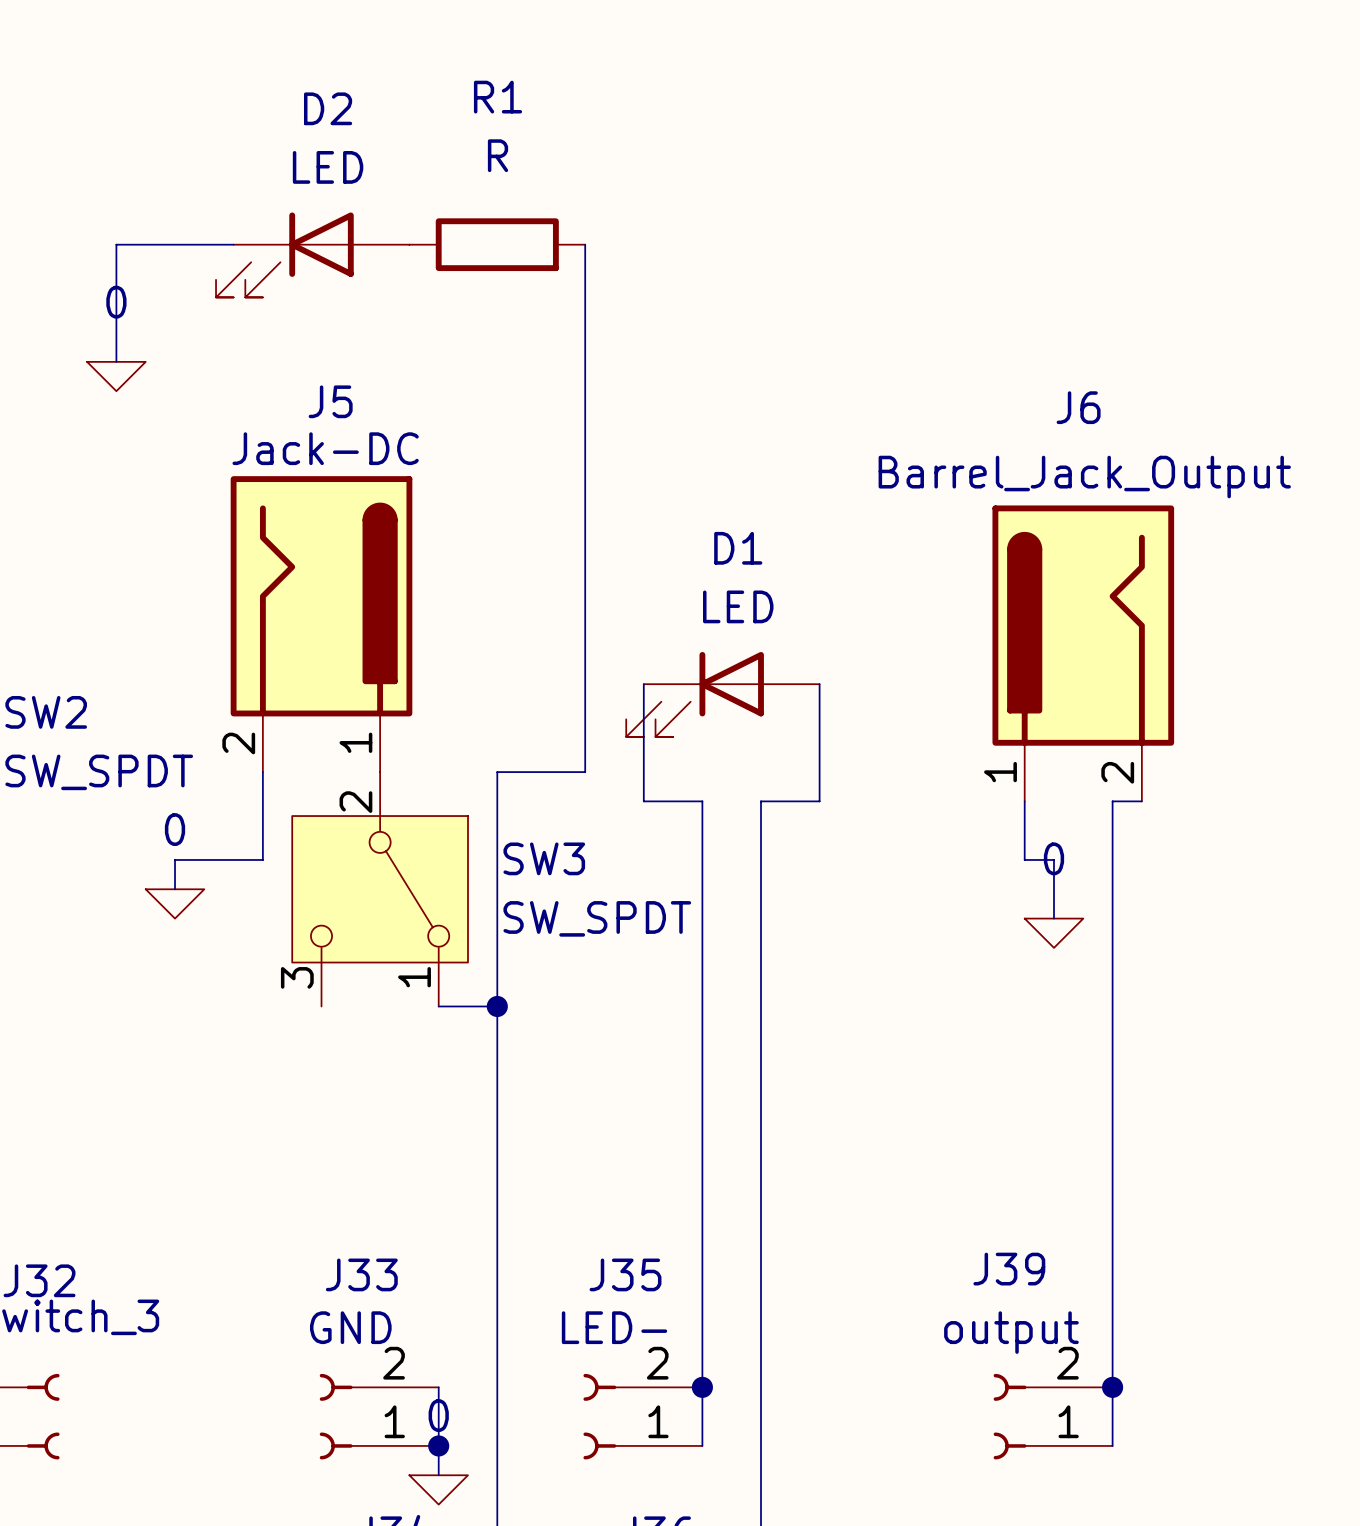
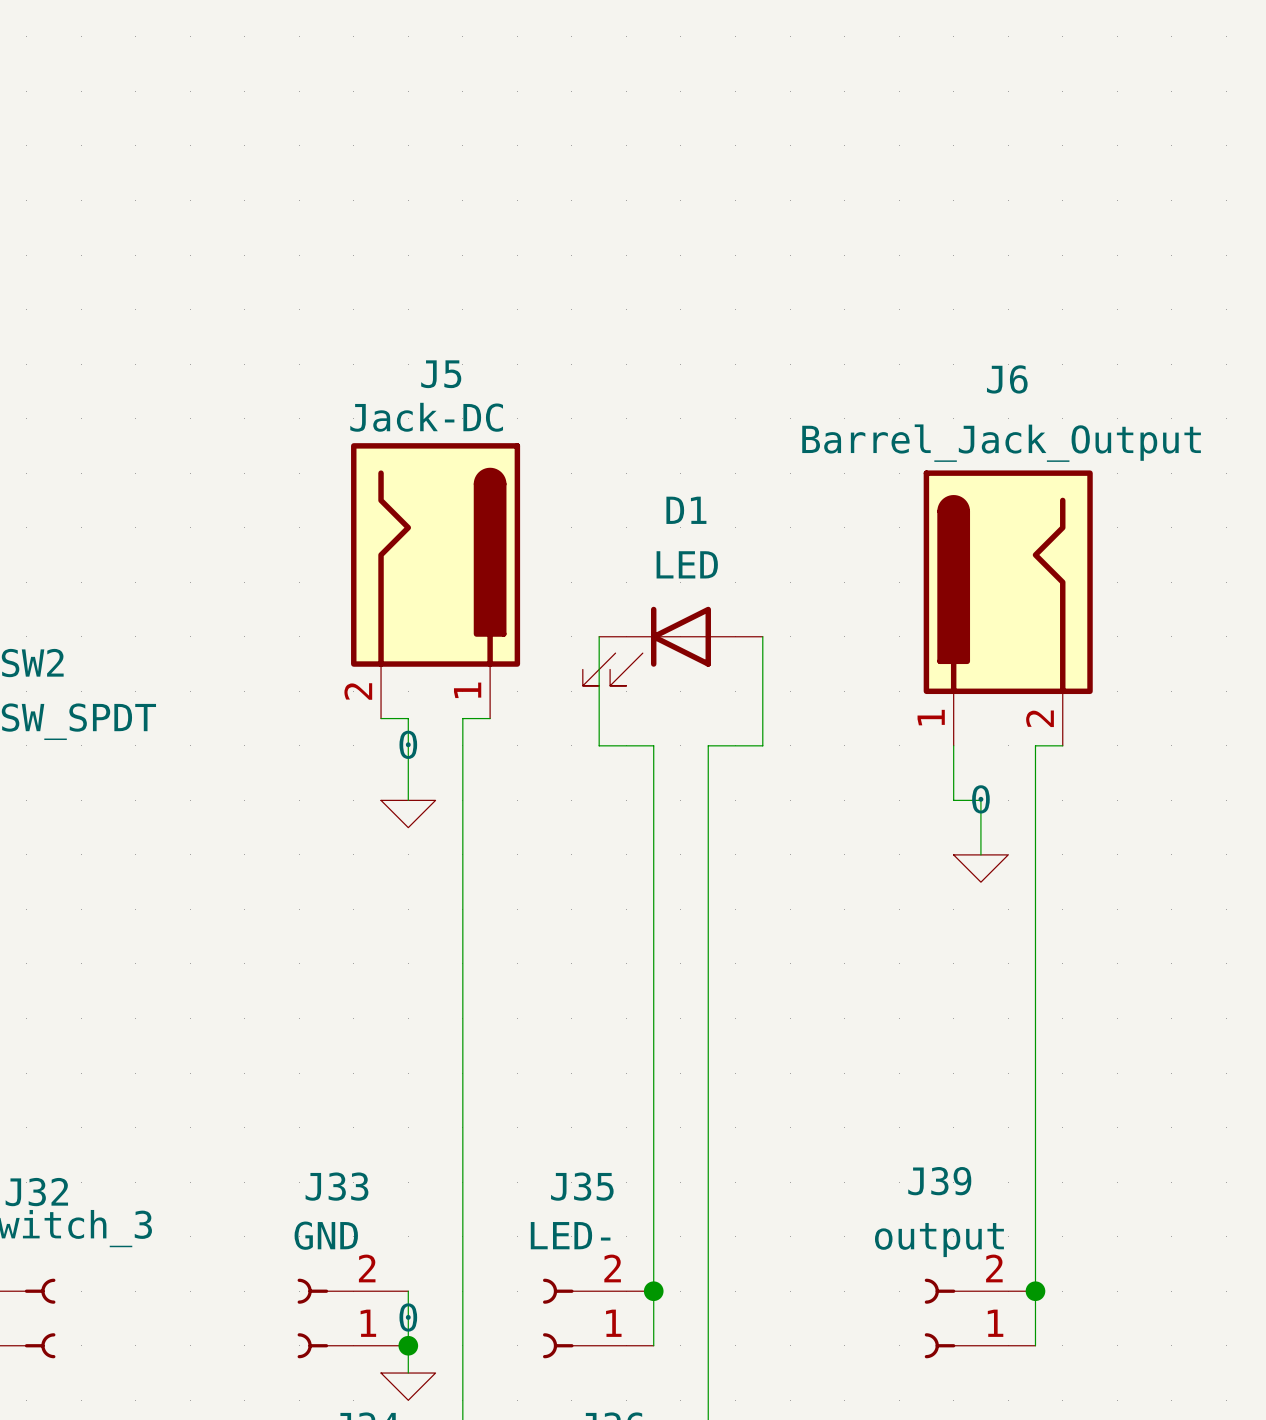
wire: (233, 244) (116, 244) (116, 361) -> none
R1: R (497, 244) -> none
wire: (585, 244) (585, 772) (526, 772) -> none
D2: LED (312, 254) -> none
power symbol: 0 (116, 376) -> none
J5 position: (321, 624) -> (435, 580)
wire: (262, 772) (262, 859) (175, 859) (175, 889) -> none
wire: none -> (381, 718) (408, 718) (408, 800)
SW3: SW_SPDT (380, 889) -> none
power symbol position: 0 (175, 903) -> 0 (408, 814)
wire: (438, 1006) (497, 1006) -> none
junction: (497, 1006) -> none

